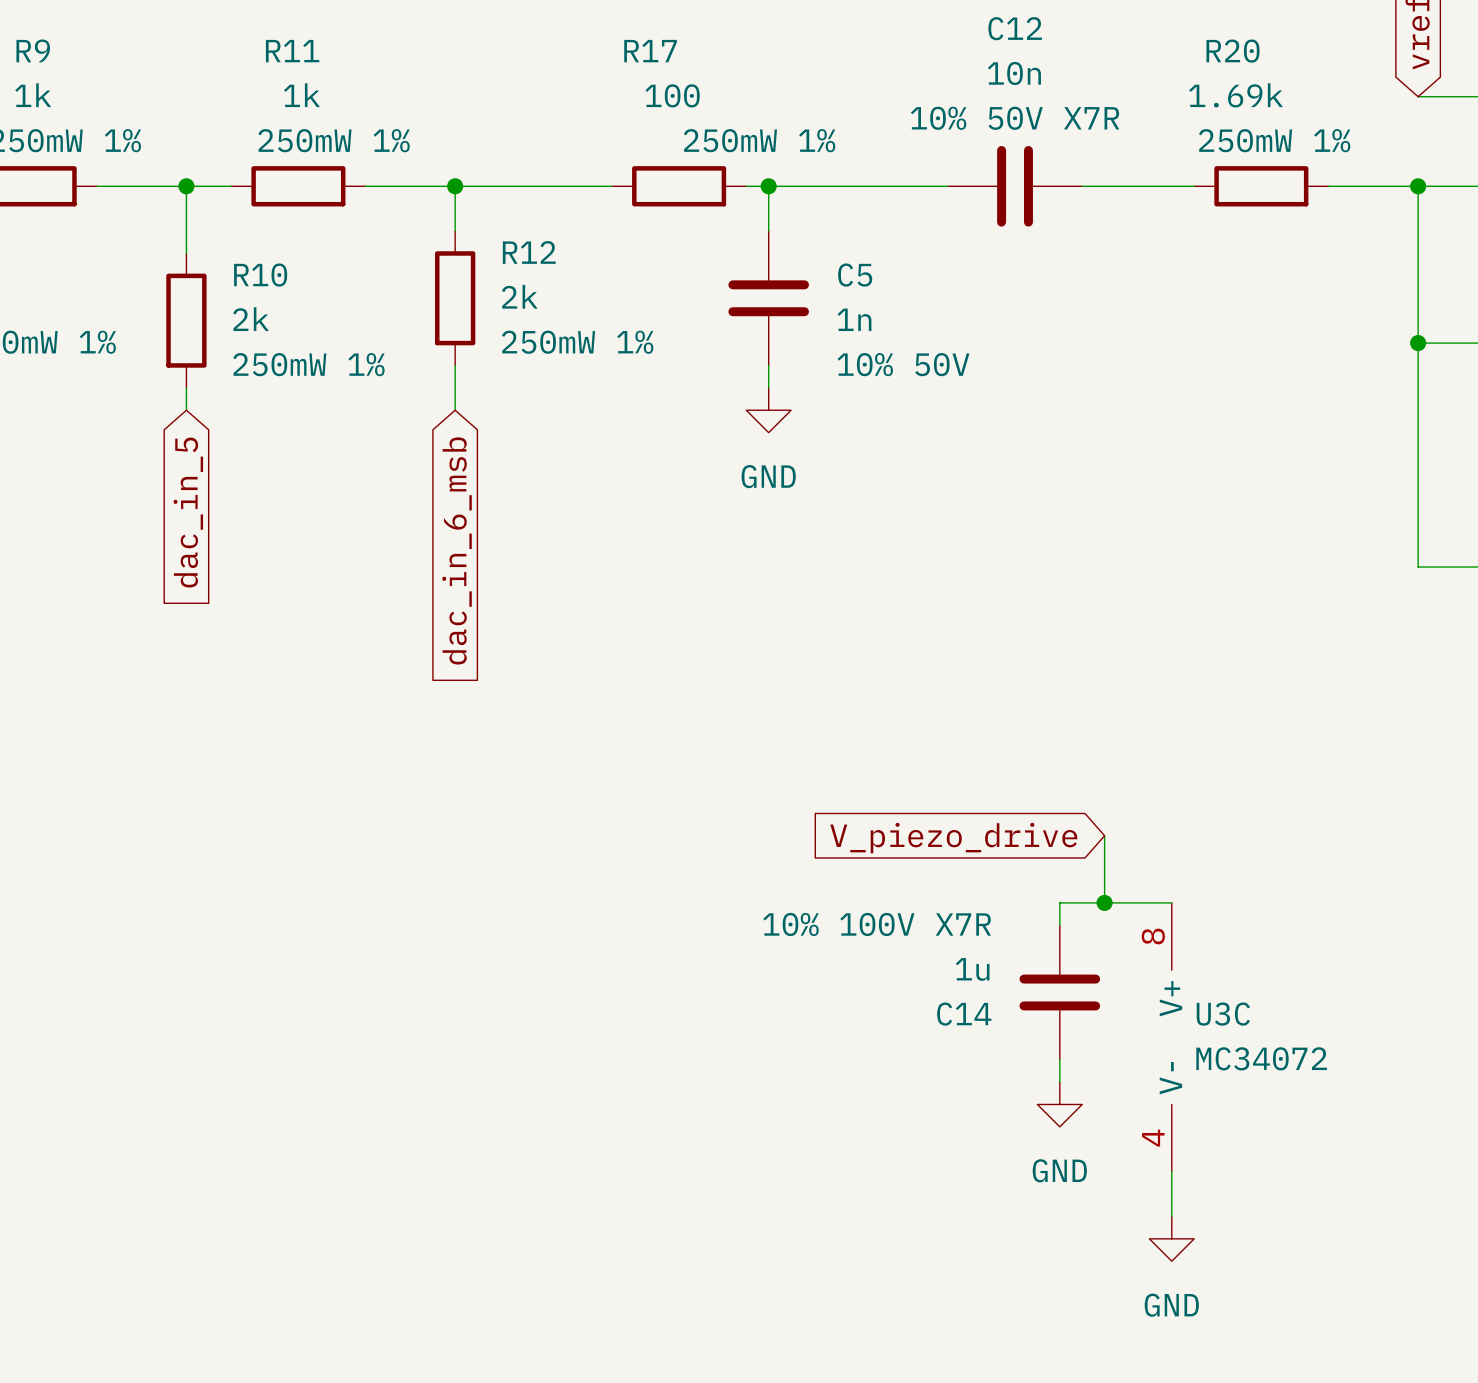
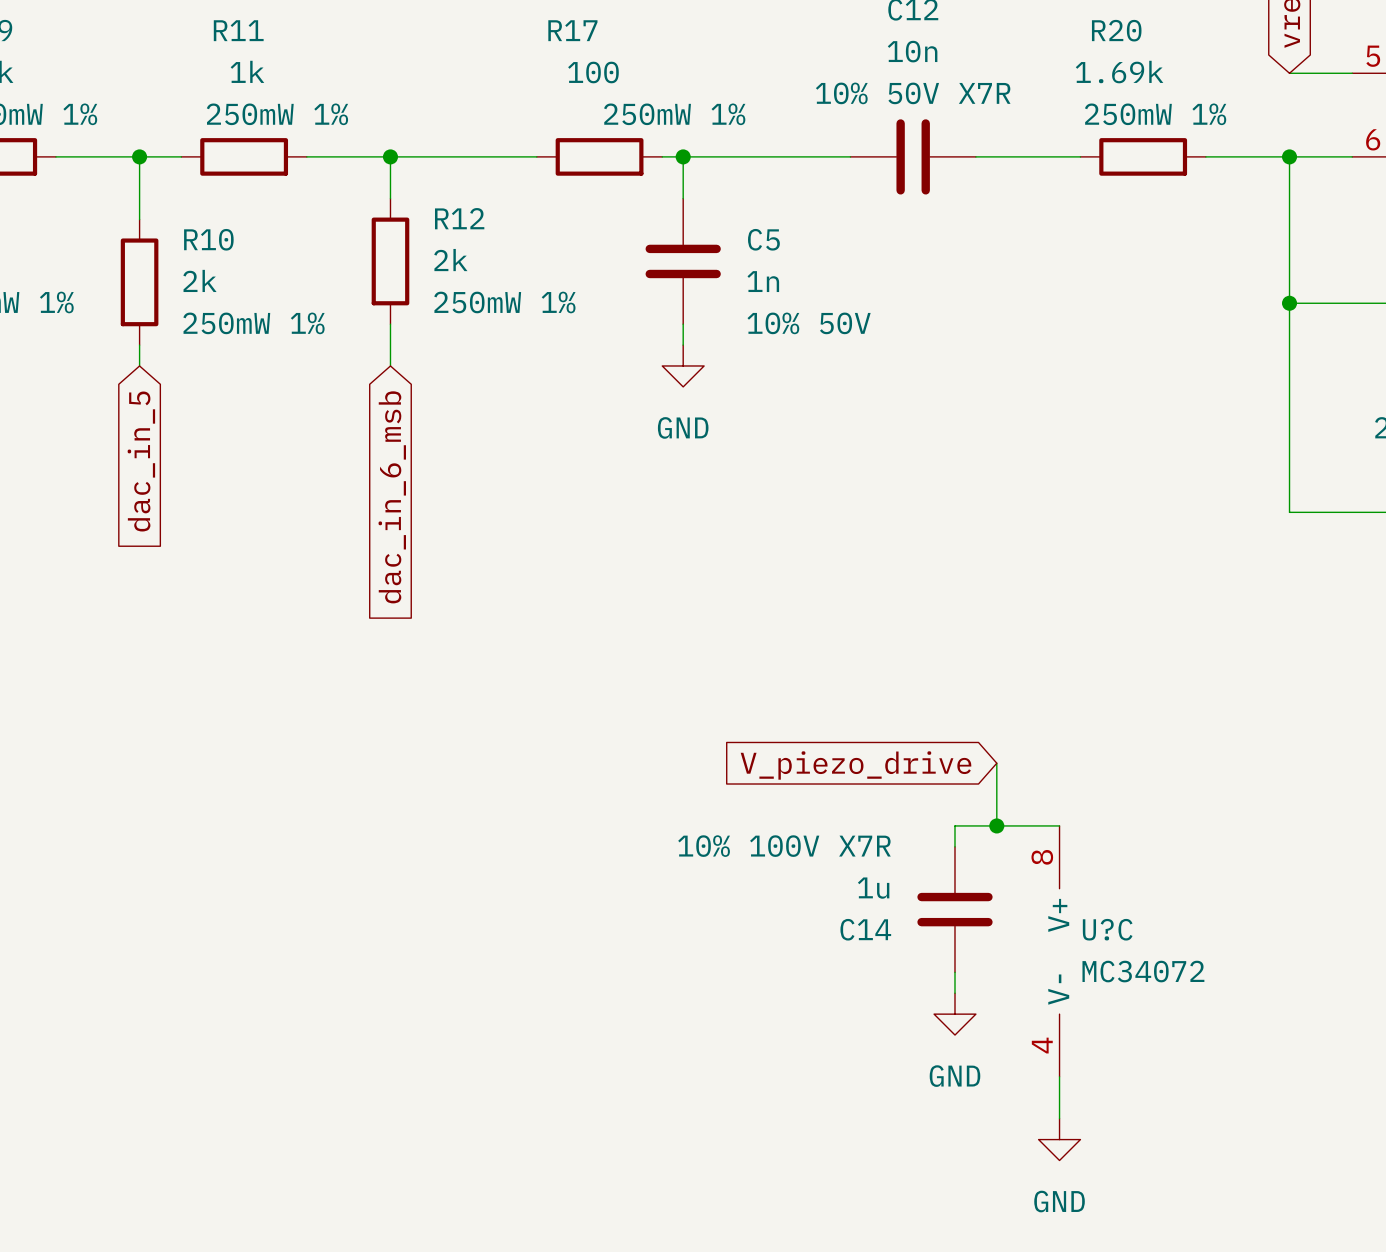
U3C name: U3C (1223, 1014) -> U?C (1107, 929)

